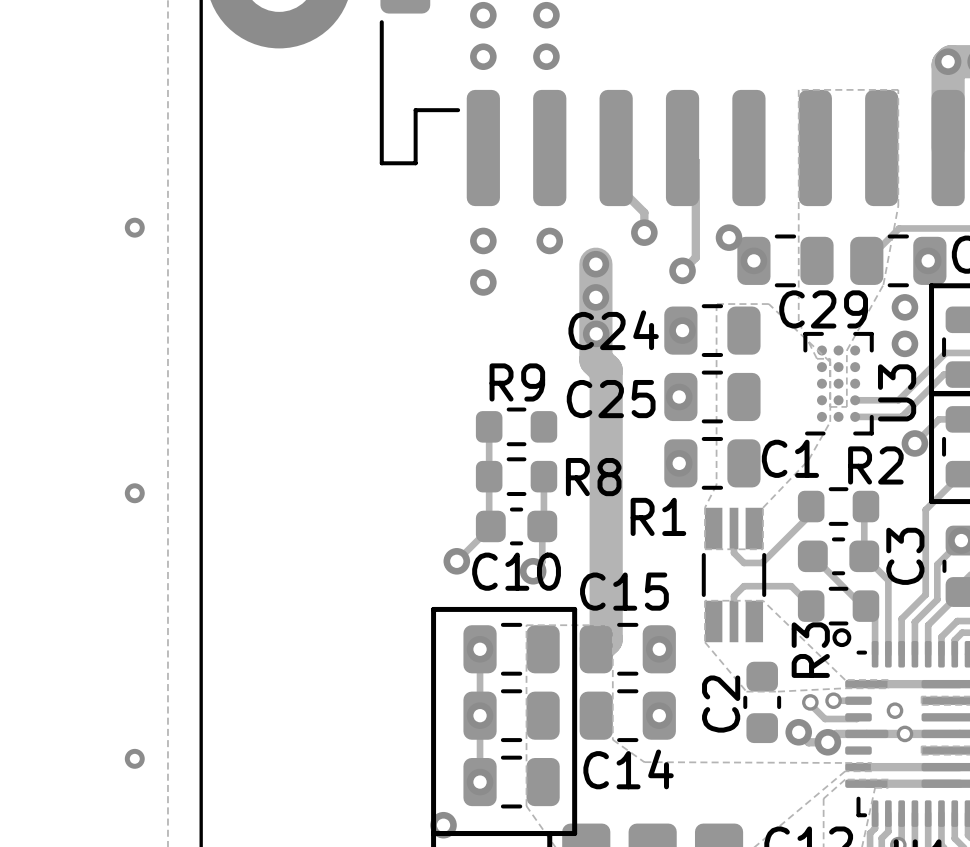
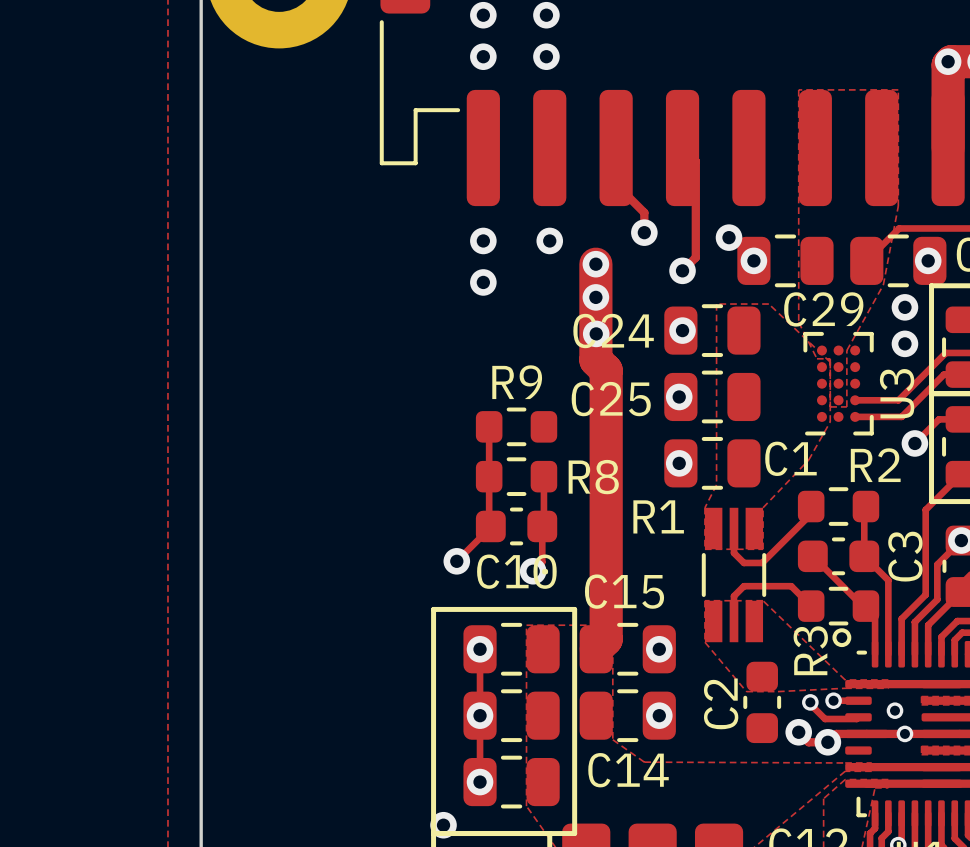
via: (134, 227) -> none
via: (134, 493) -> none
via: (134, 758) -> none

